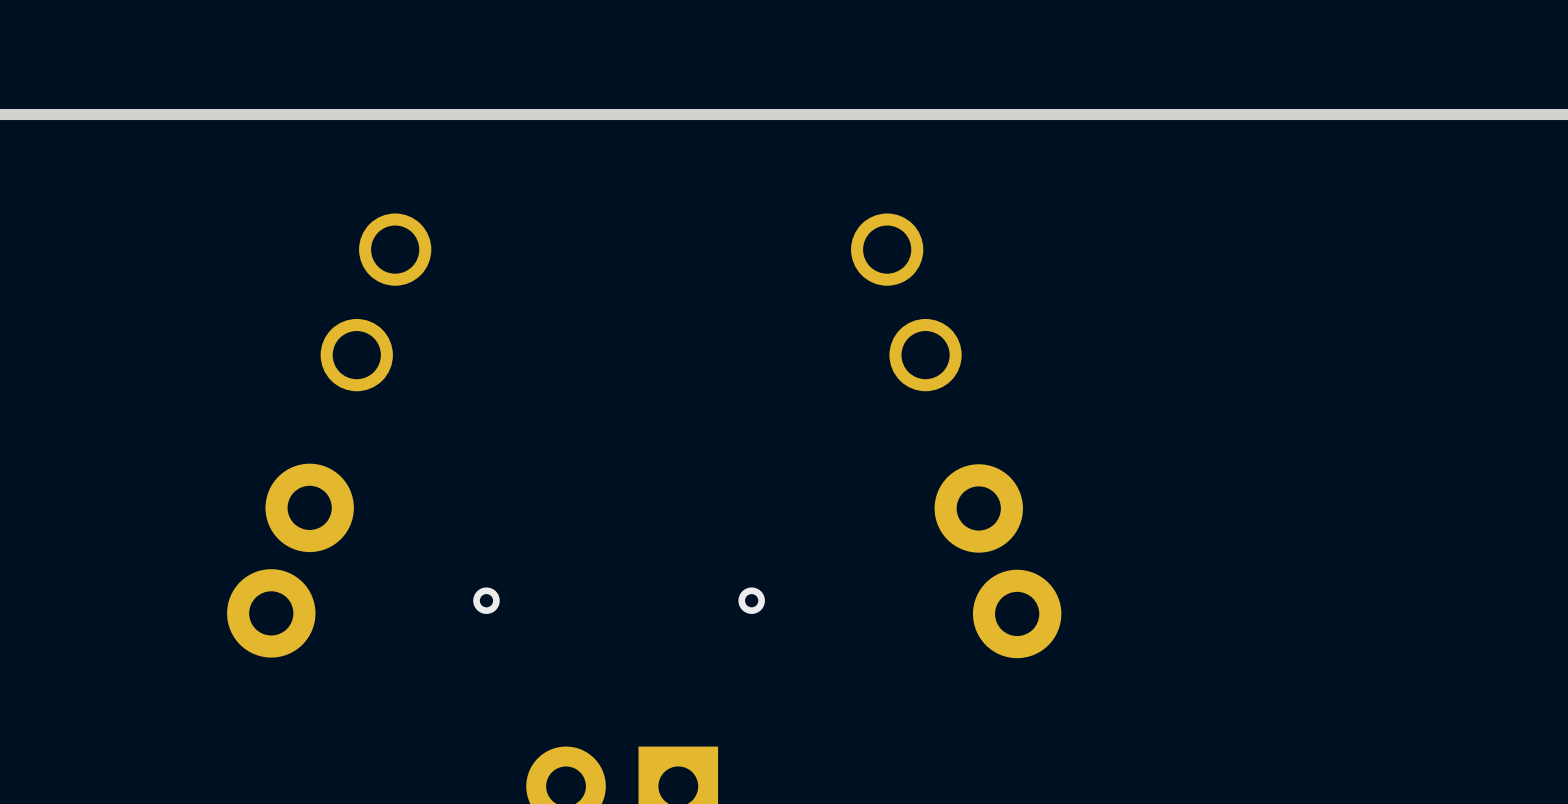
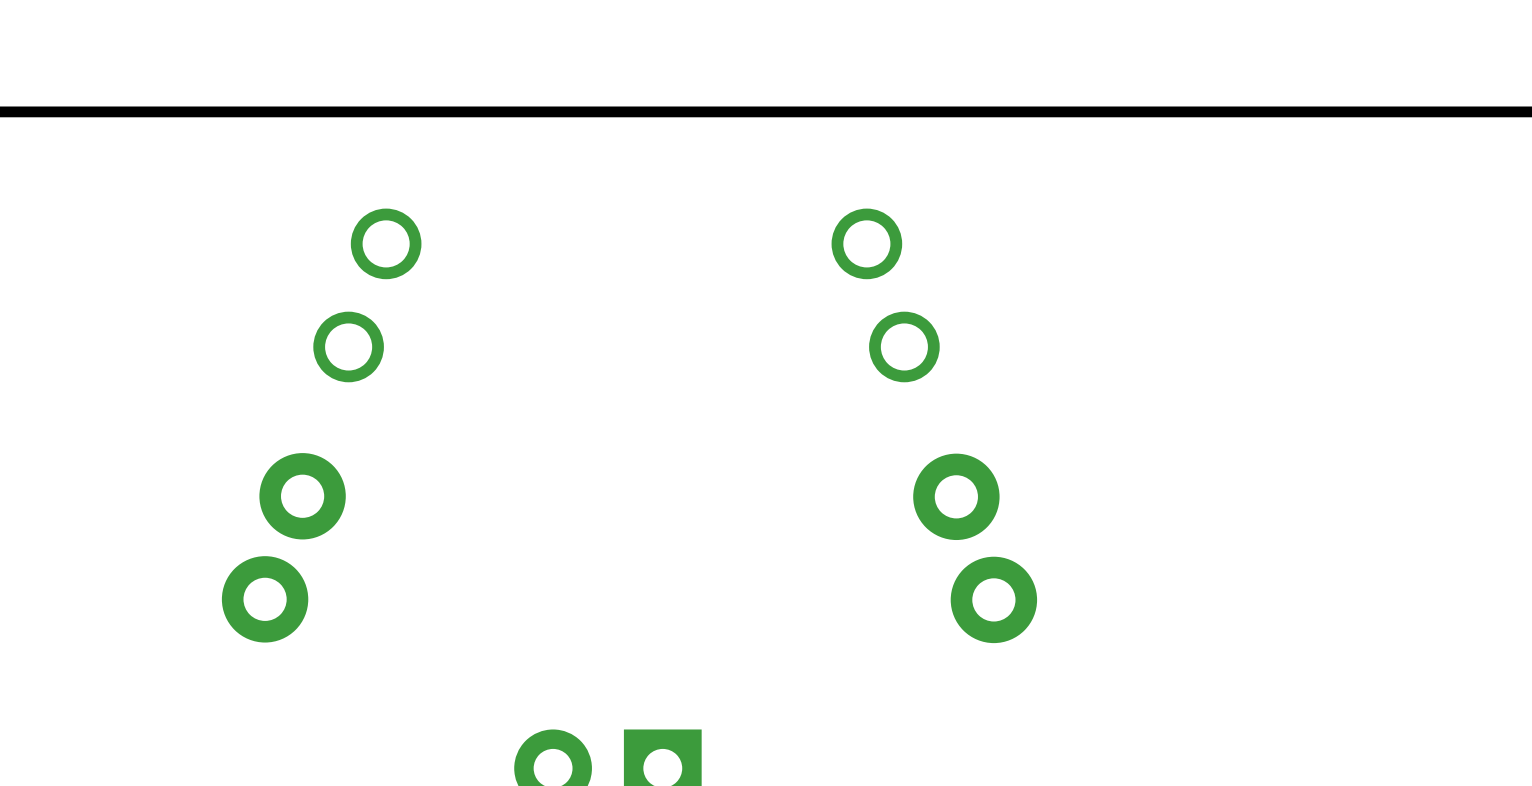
via: (486, 600) -> none
via: (751, 600) -> none

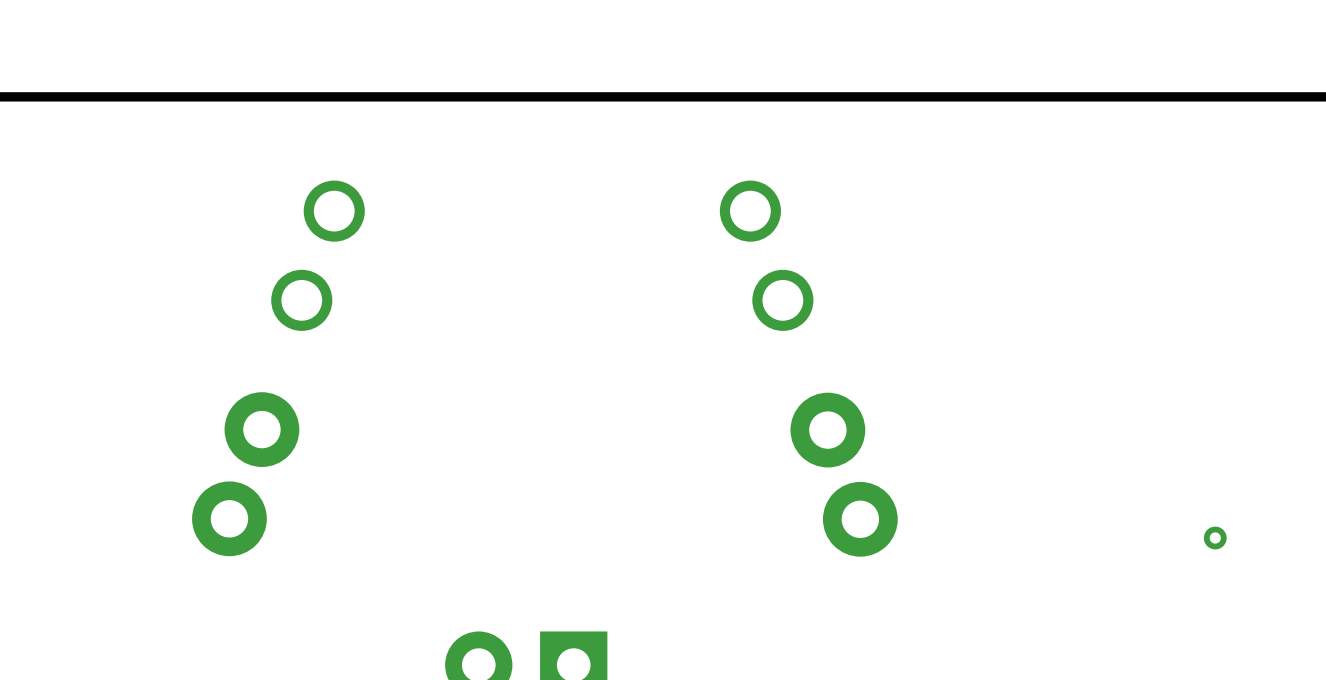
via: none -> (1215, 538)

